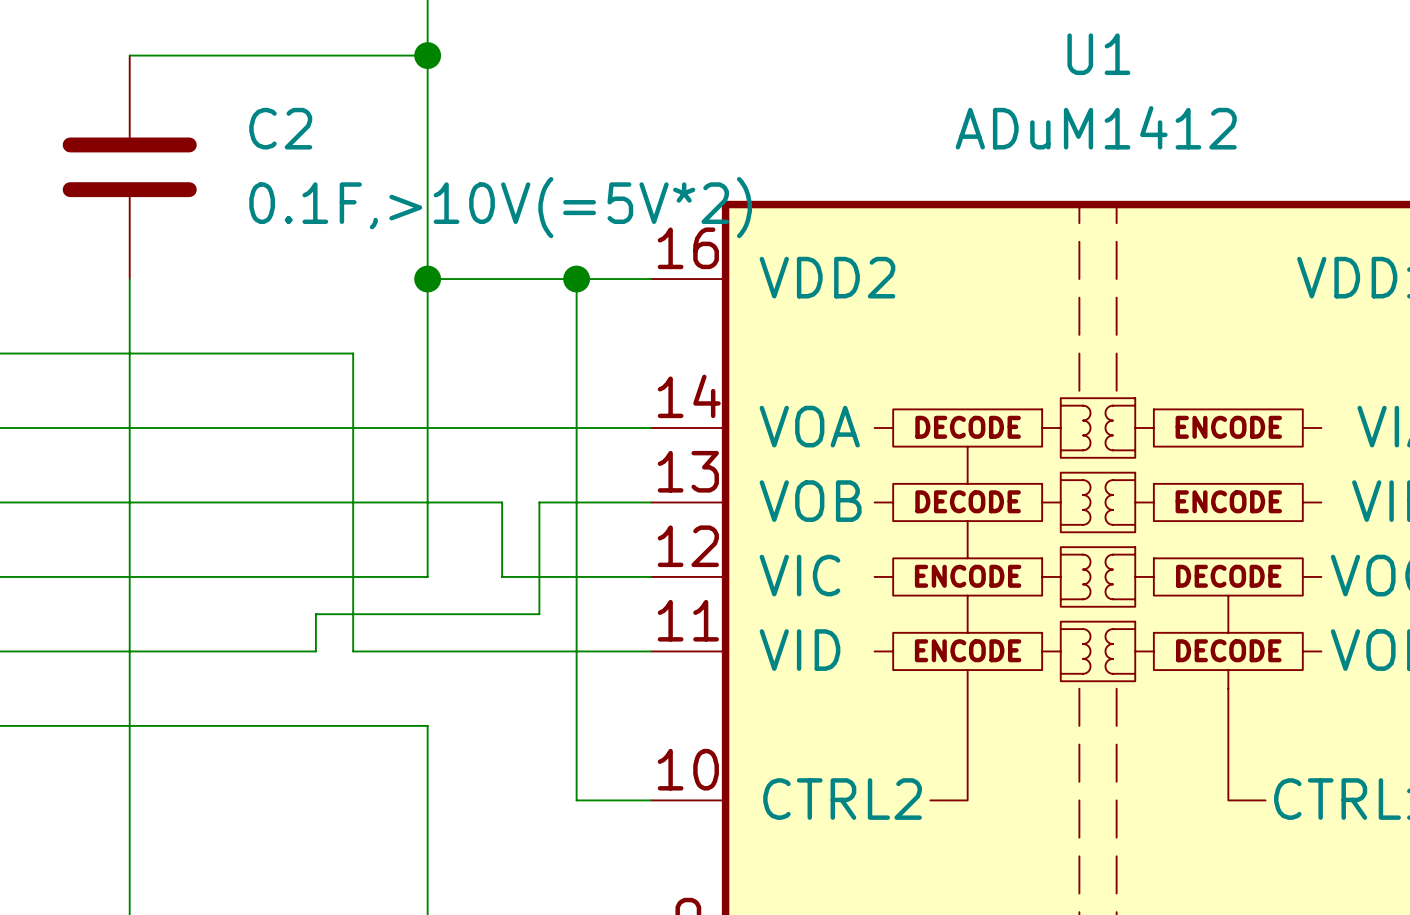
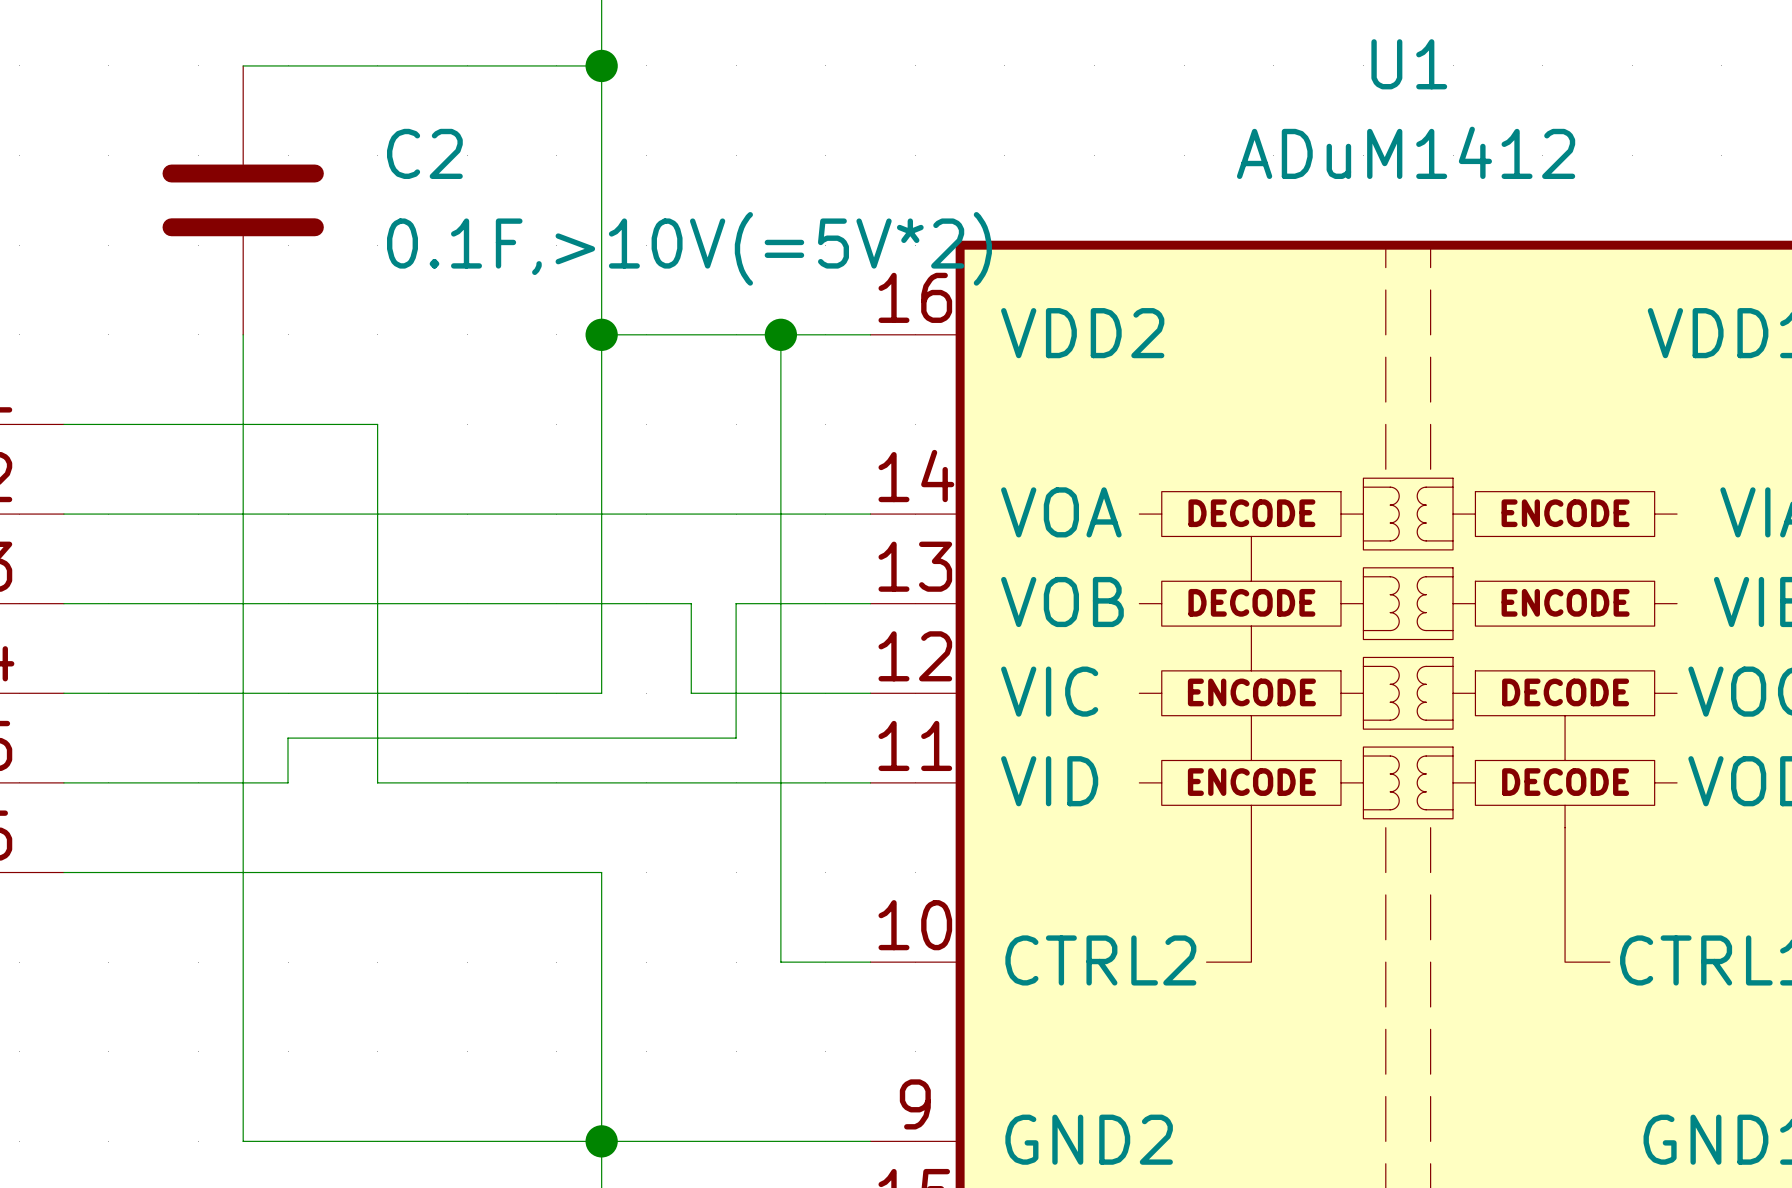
wire: (241, 353) (353, 353) (353, 651) -> (377, 424) (377, 782)
wire: (315, 614) (315, 651) -> (512, 782) (467, 782)
wire: (166, 651) (241, 651) -> (288, 782) (288, 738) (467, 738)

